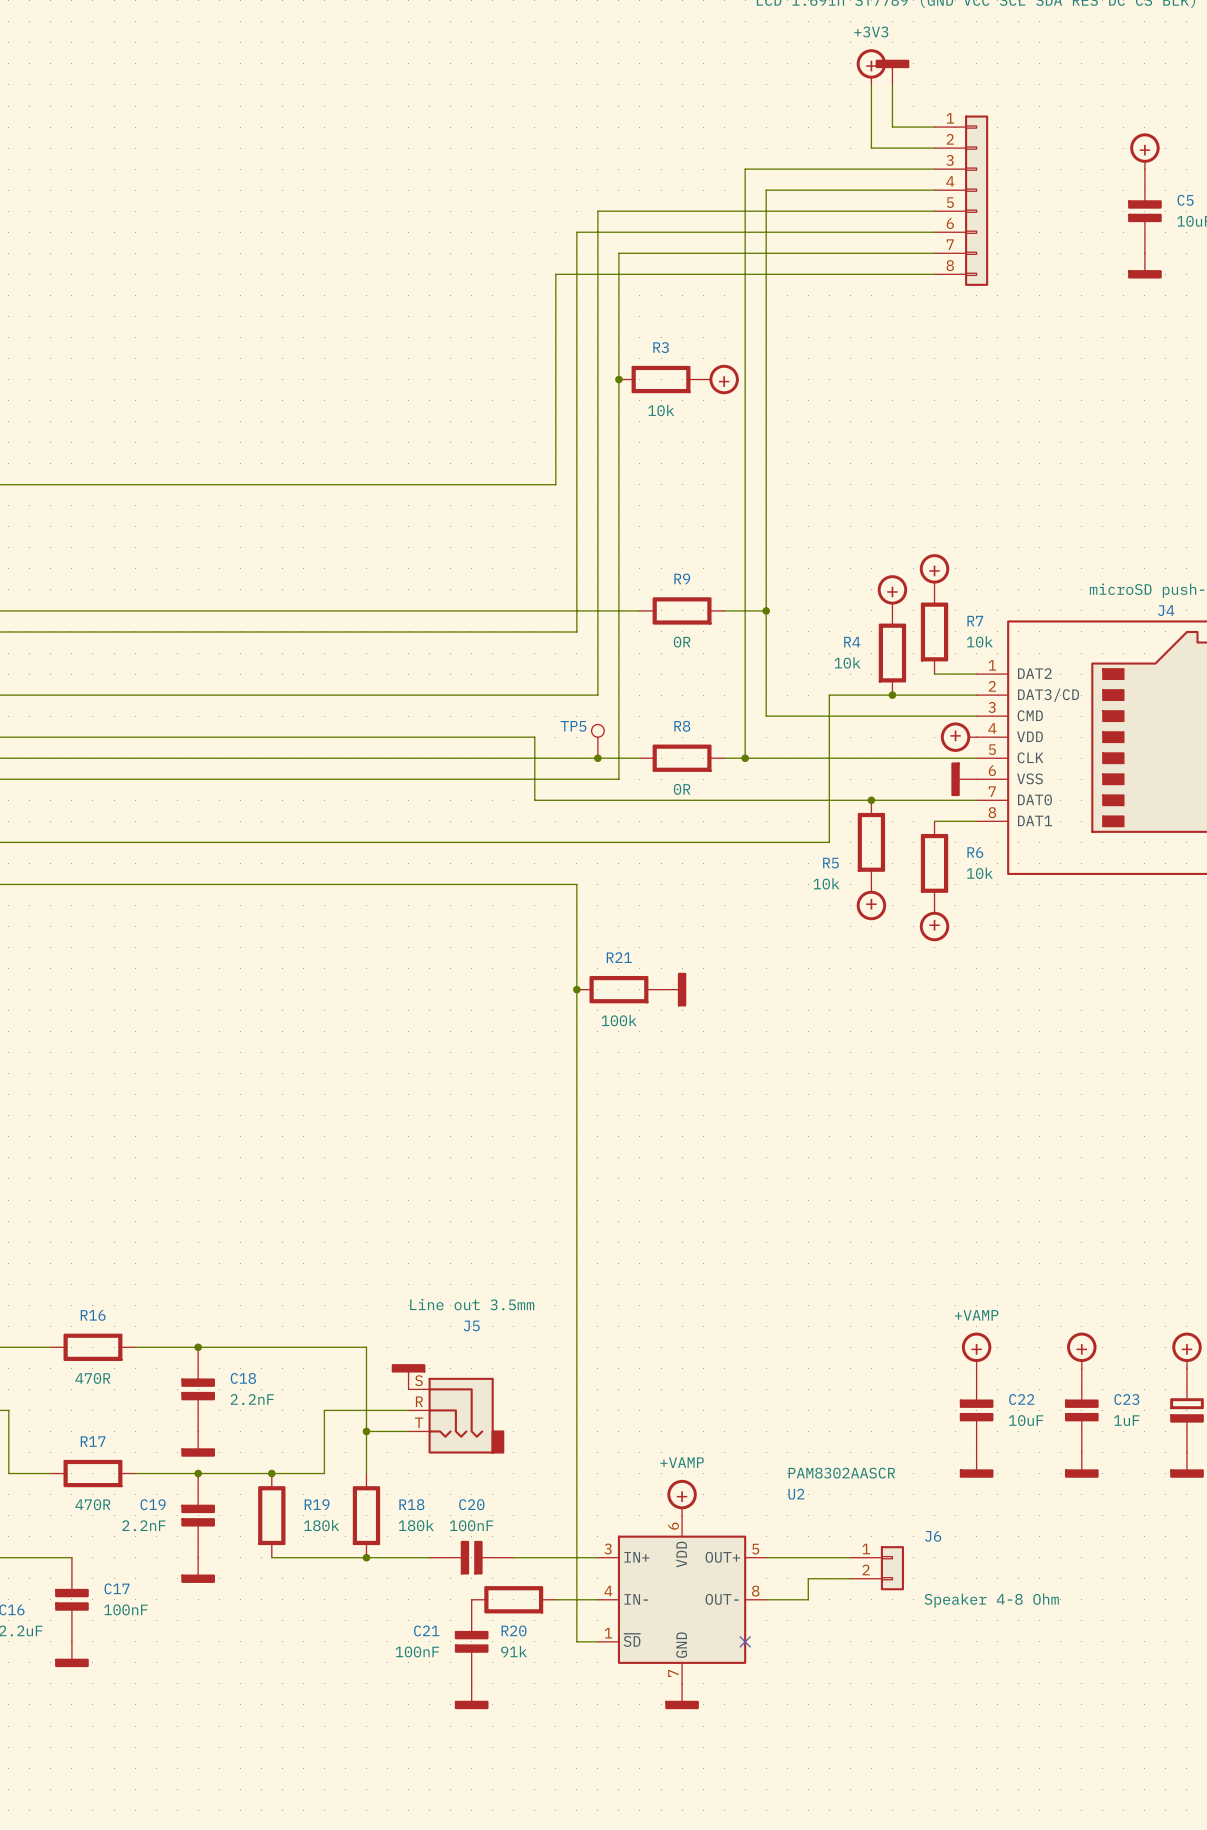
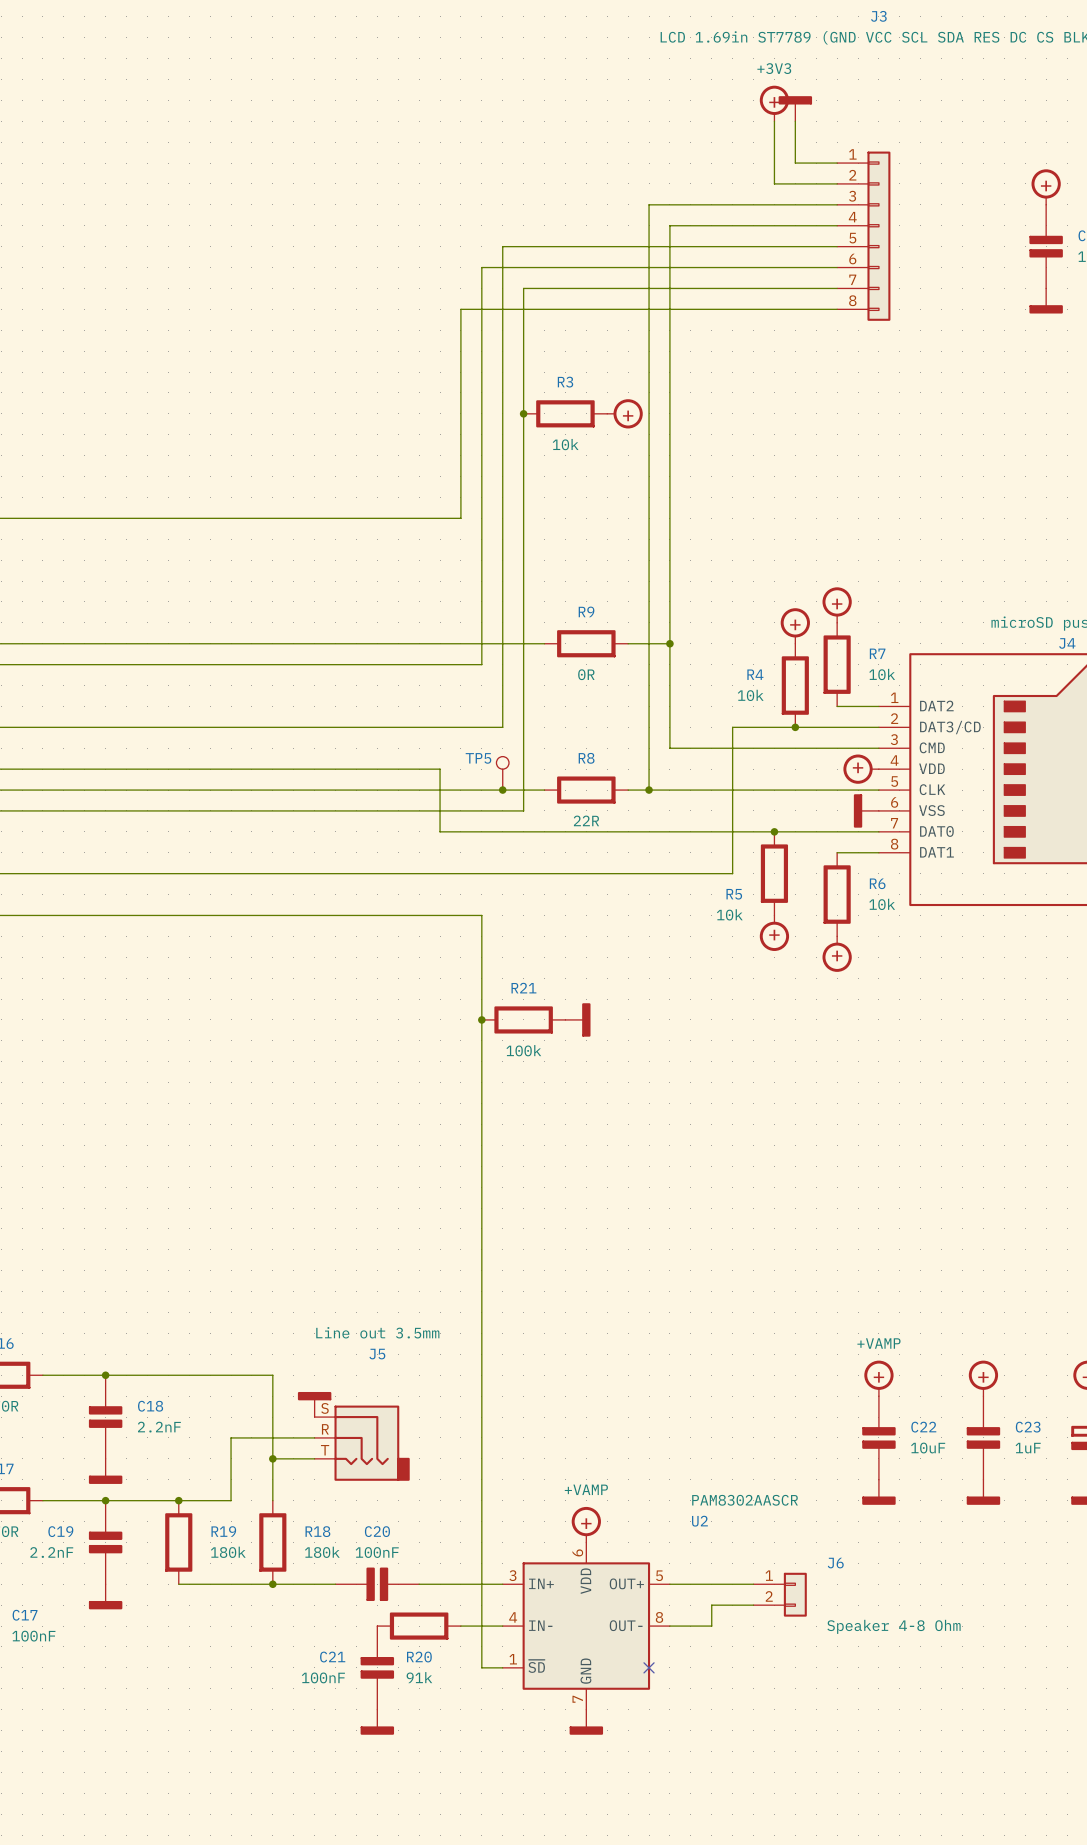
R8 value: 0R (682, 789) -> 22R (586, 820)

